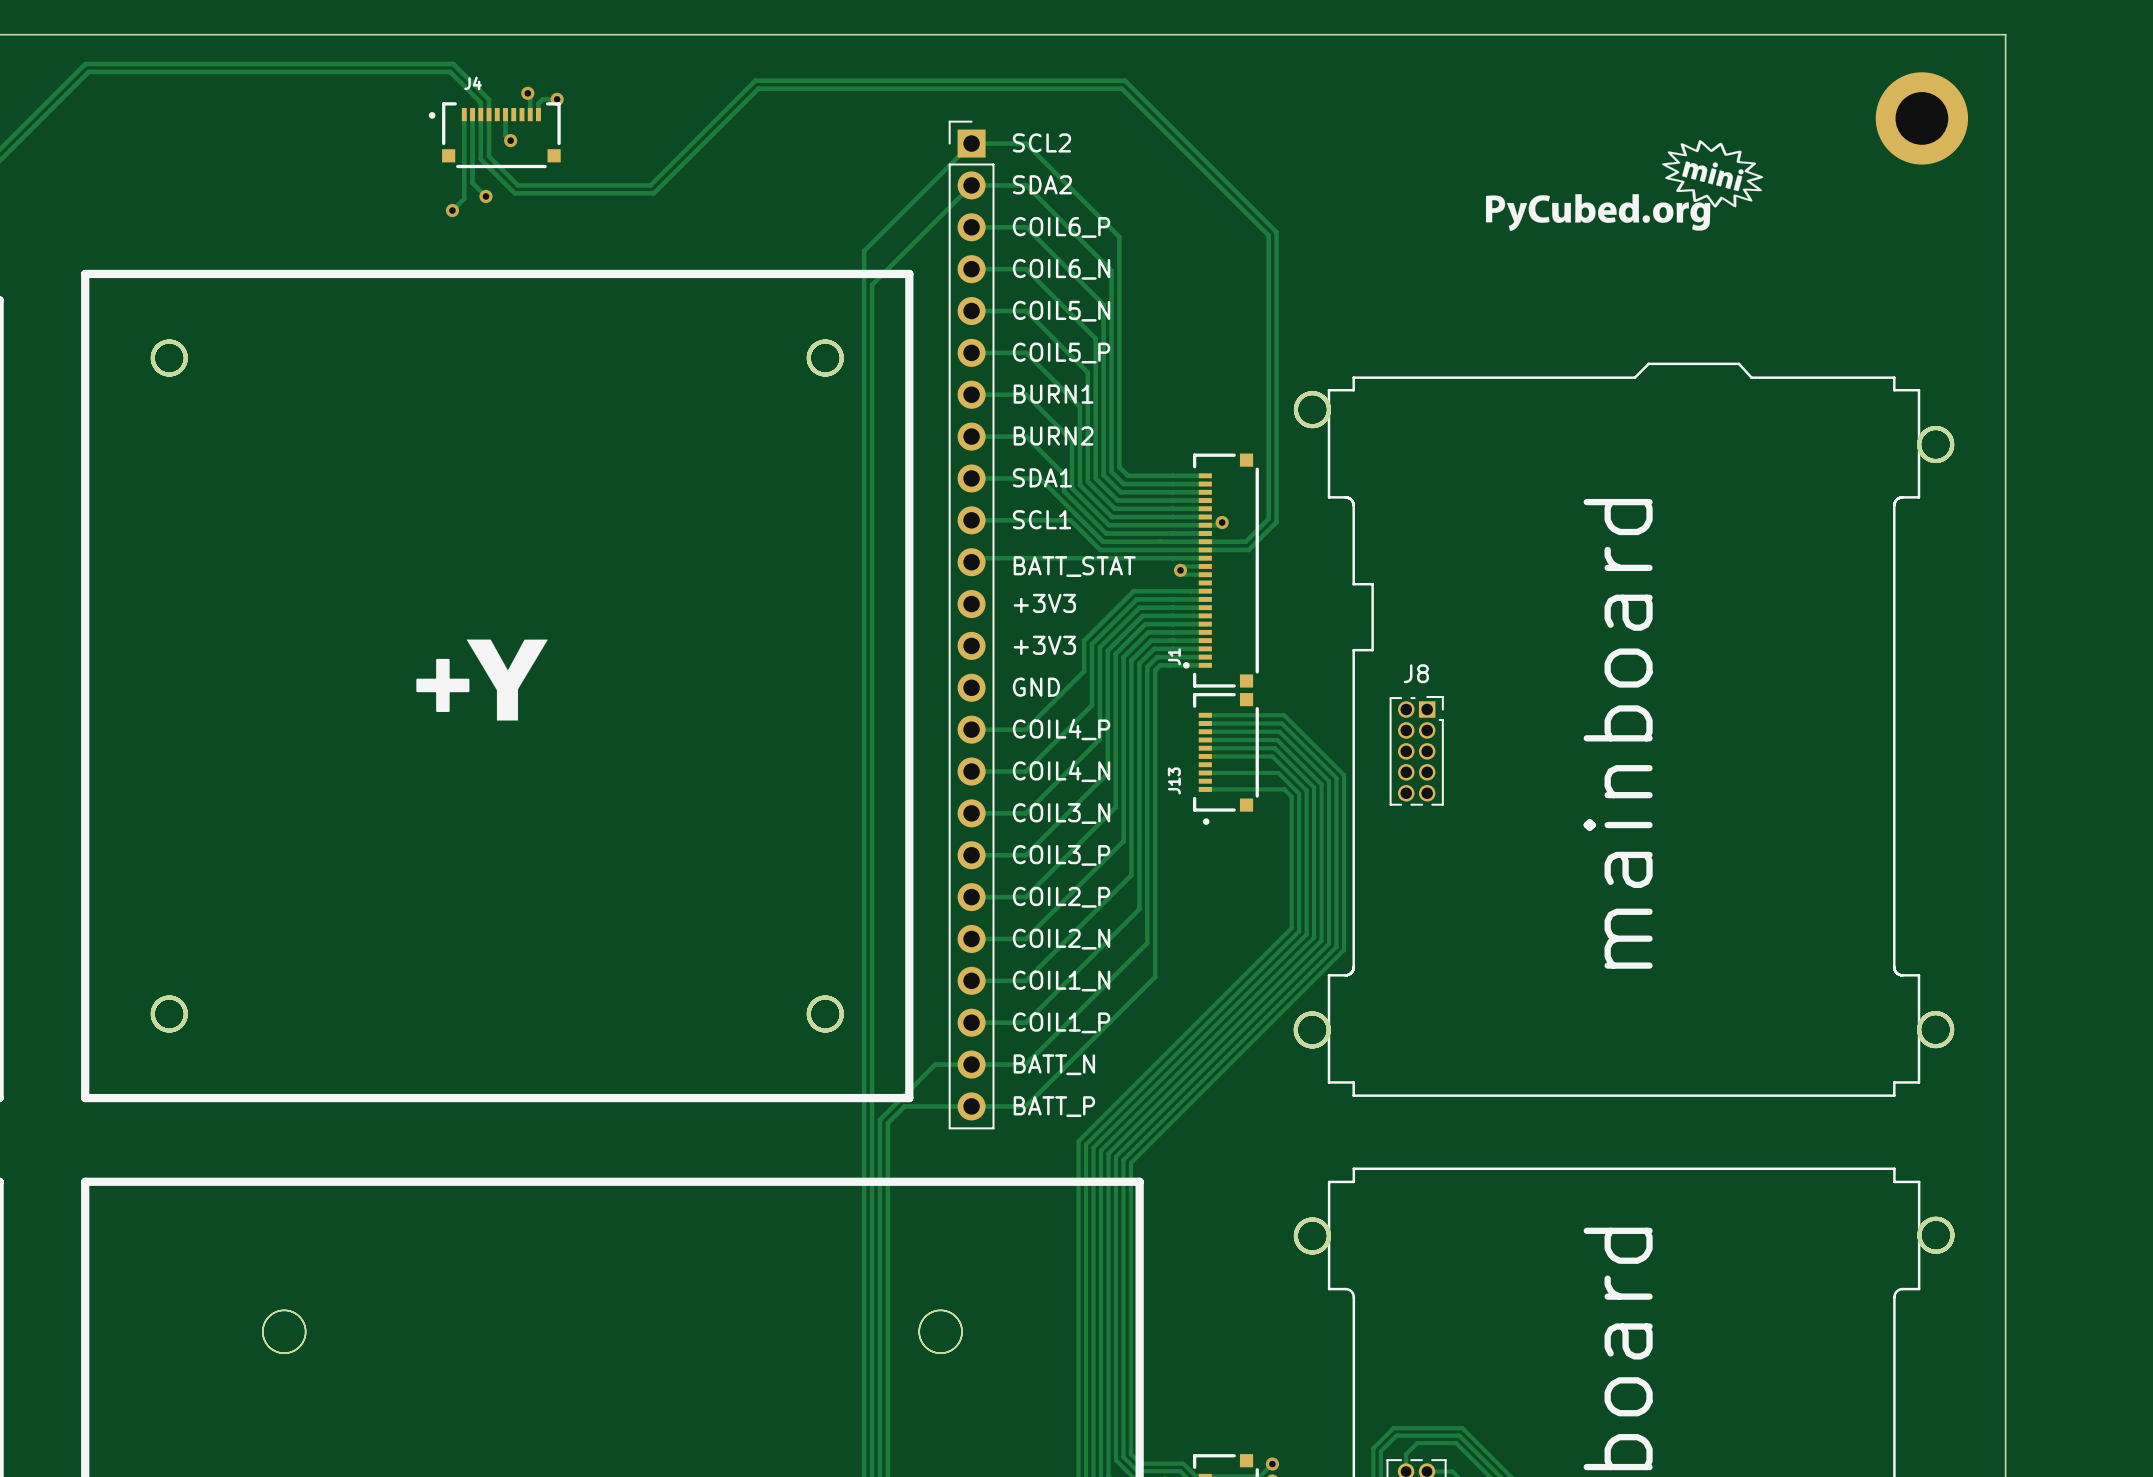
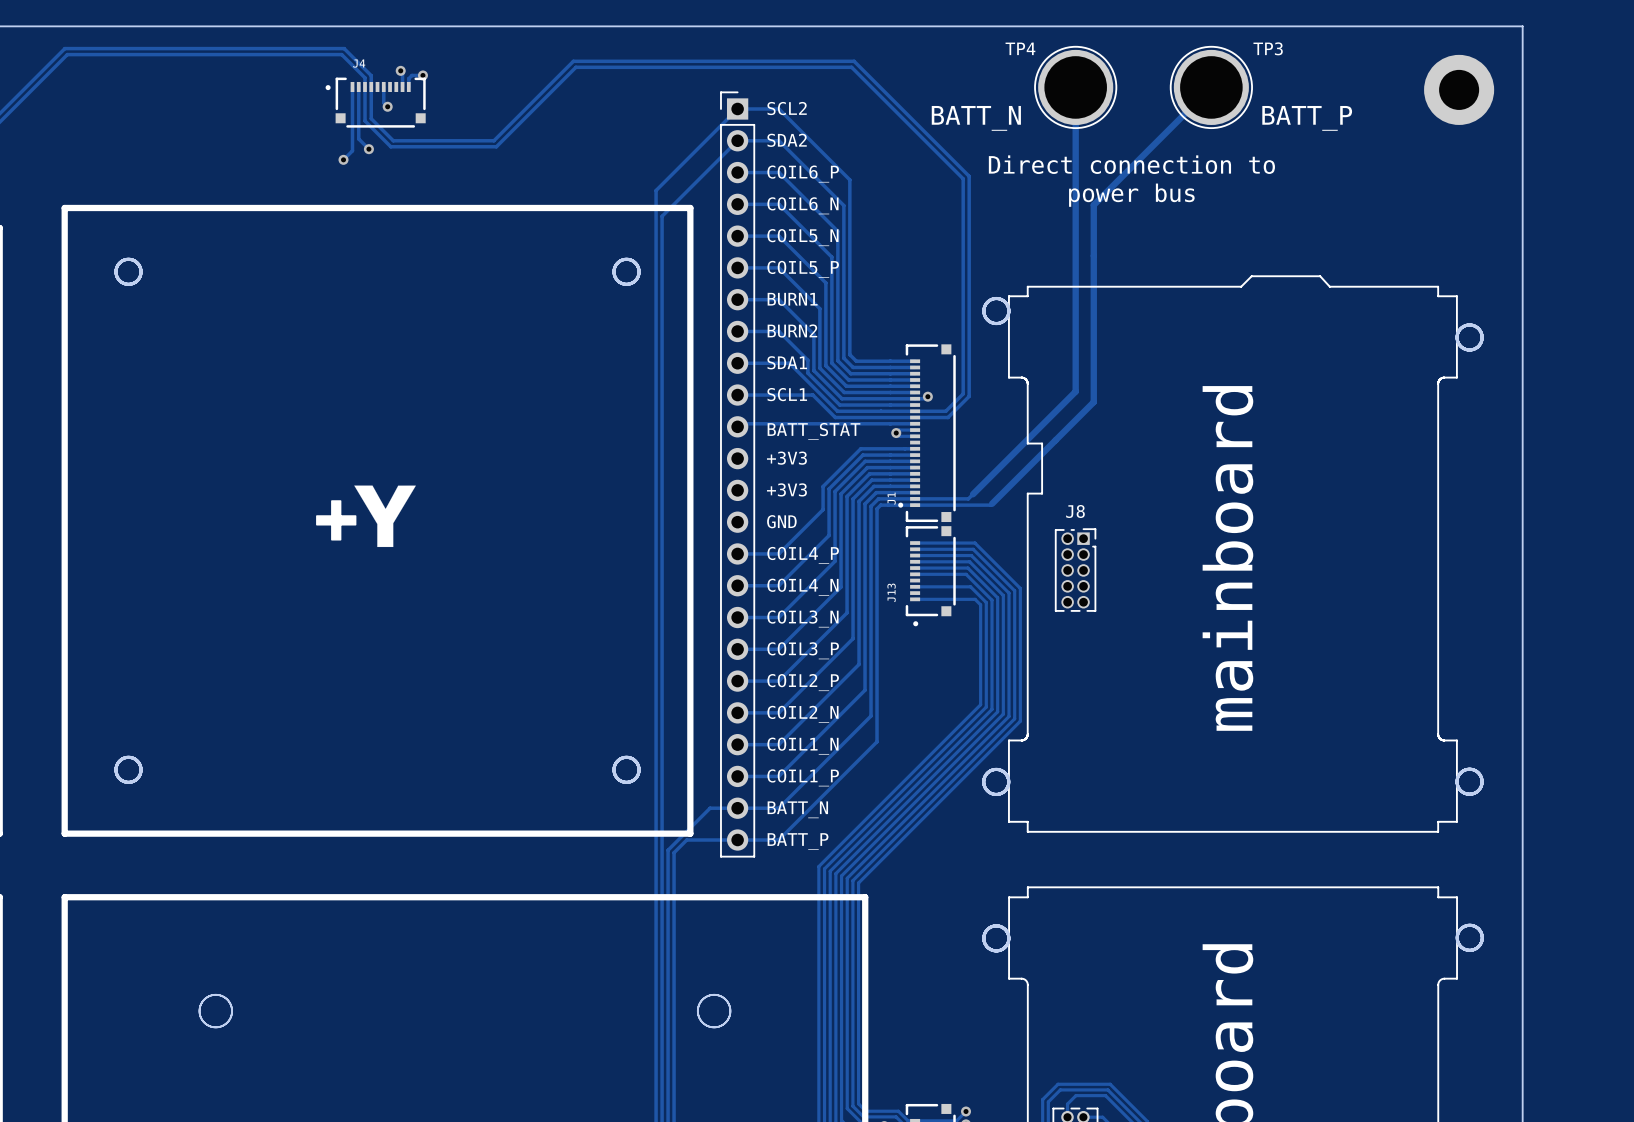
track: none -> (1075, 87) (1075, 391) (968, 498) (915, 498)
TP4: none -> (1075, 87)
track: none -> (1211, 87) (1093, 205) (1093, 402) (990, 505) (915, 505)
TP3: none -> (1211, 87)
drawing: [1485, 140, 1764, 232] -> none
text: none -> BATT_N (976, 118)
text: none -> BATT_P (1307, 118)
text: none -> Direct connection to (1131, 164)
text: none -> power bus (1131, 195)

